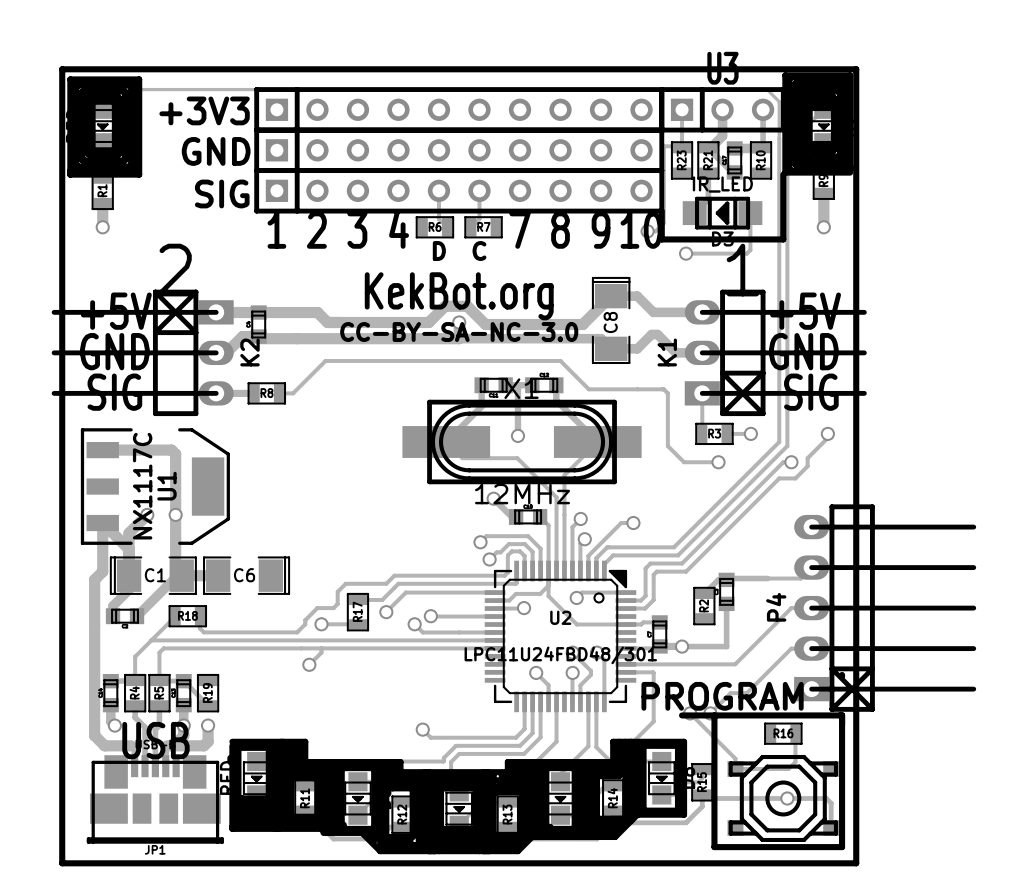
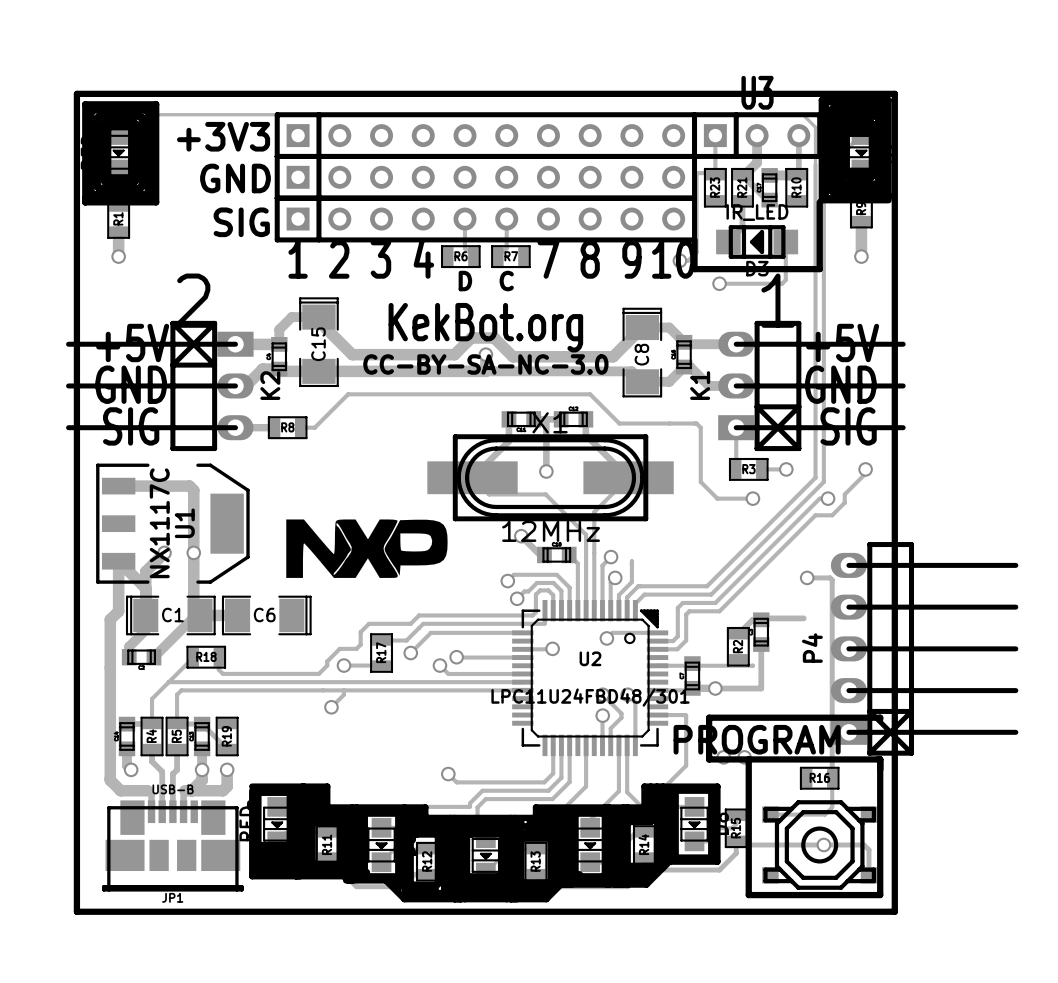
C15: none -> (318, 342)
track: (258, 312) (317, 312) (329, 322) -> (279, 344) (279, 329) (291, 317) (318, 317) (318, 321) (352, 354)
part: none -> (684, 354)
drawing: none -> [286, 519, 448, 578]
track: (633, 523) (621, 523) (601, 543) -> (631, 561) (631, 582)
via: (633, 523) -> none
track: none -> (807, 577) (830, 577) (832, 580) (832, 778)
via: none -> (807, 577)
track: (811, 567) (800, 578) (767, 578) -> none
track: (548, 571) (548, 596) (576, 624) (625, 624) -> none
track: (548, 585) (540, 593) (515, 593) (509, 600) (495, 600) -> none
track: (811, 608) (791, 608) (735, 664) (625, 664) -> none
track: (659, 622) (643, 622) (641, 624) -> (752, 665) (673, 665)
track: (811, 648) (791, 648) (746, 693) (730, 693) (710, 713) -> none
track: (536, 672) (548, 685) (548, 701) -> none
via: (536, 672) -> none
line: none -> (880, 717) (709, 717) (709, 759) (713, 759)
track: (690, 713) (735, 758) (735, 769) -> none
text: USB (155, 740) -> none

